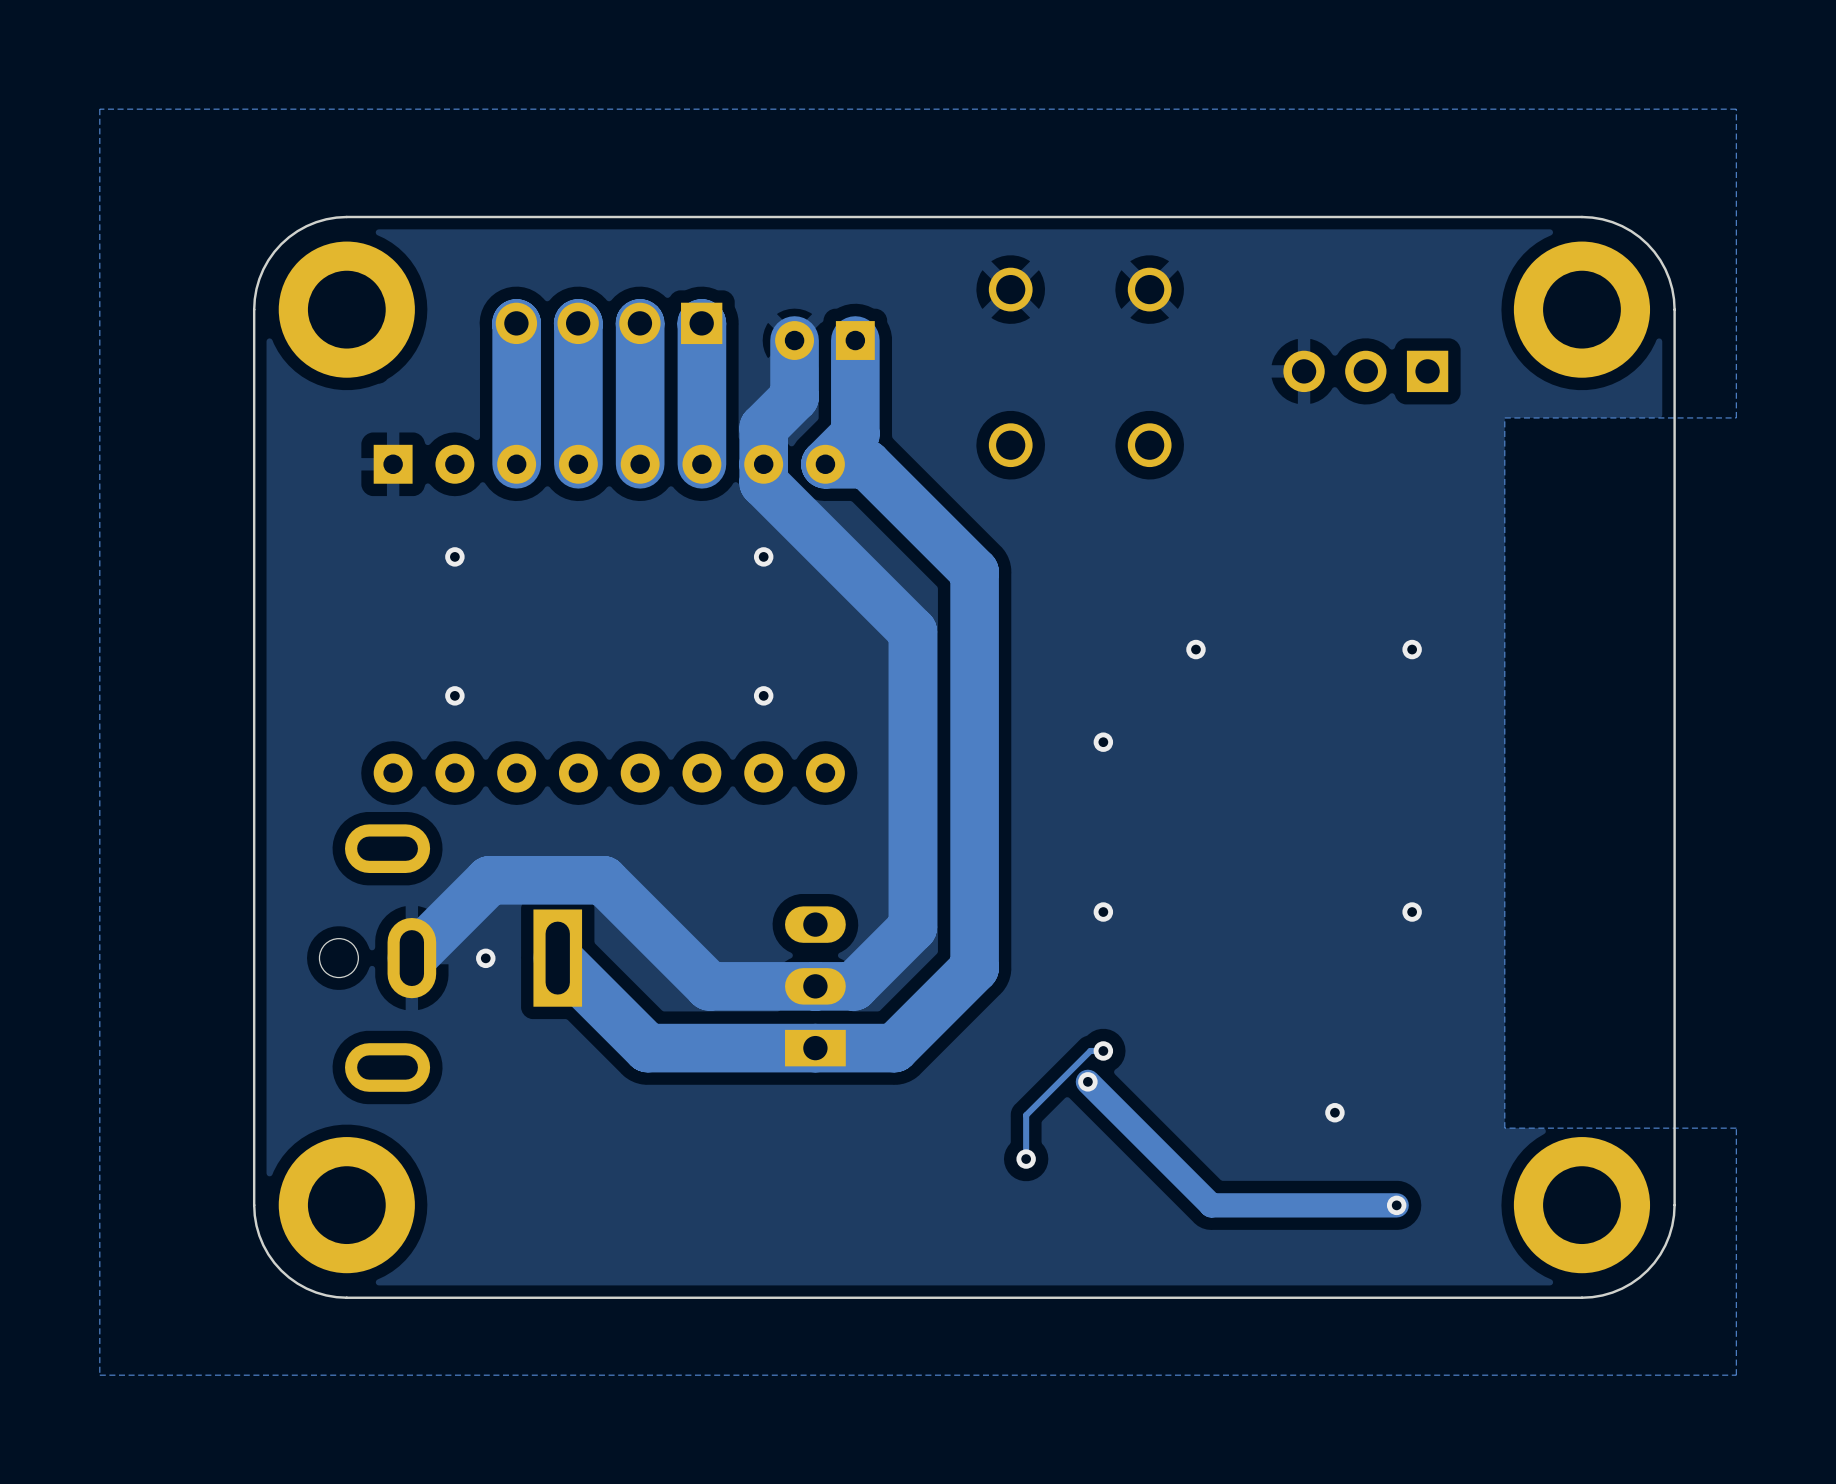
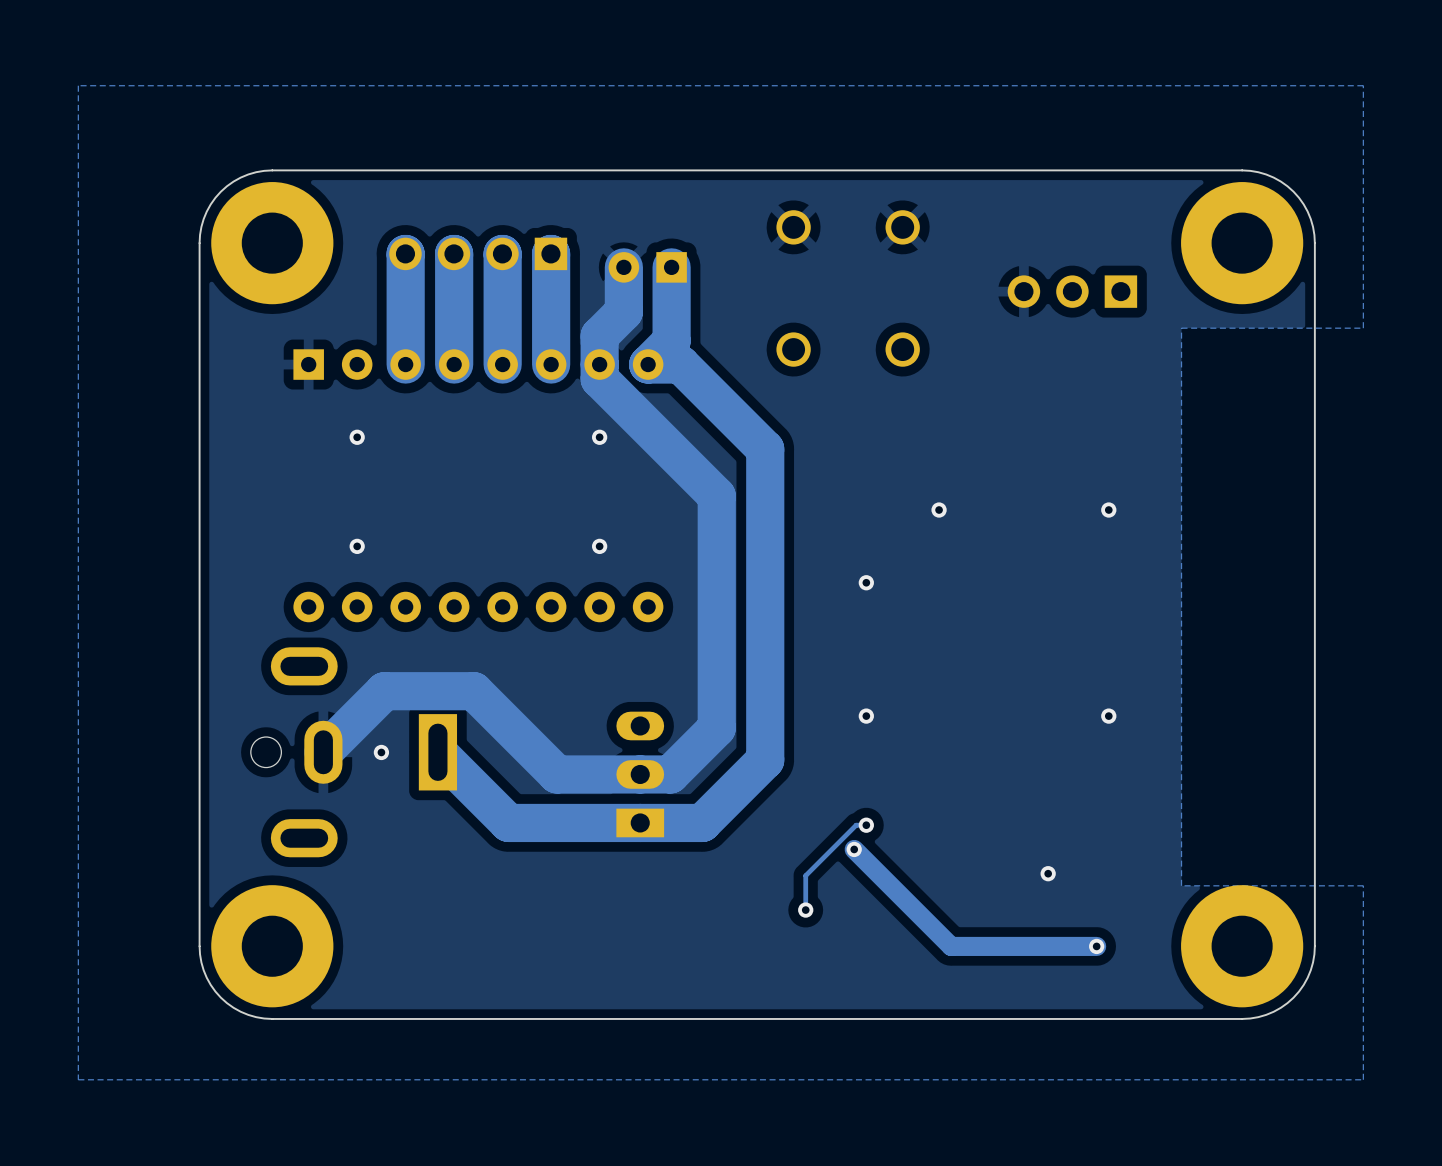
part footprint: [278, 241, 415, 378] -> [211, 182, 334, 305]
part footprint: [1513, 241, 1651, 378] -> [1181, 182, 1304, 305]
part footprint: [278, 1137, 415, 1274] -> [211, 885, 334, 1008]
part footprint: [1513, 1137, 1651, 1274] -> [1181, 885, 1304, 1008]

